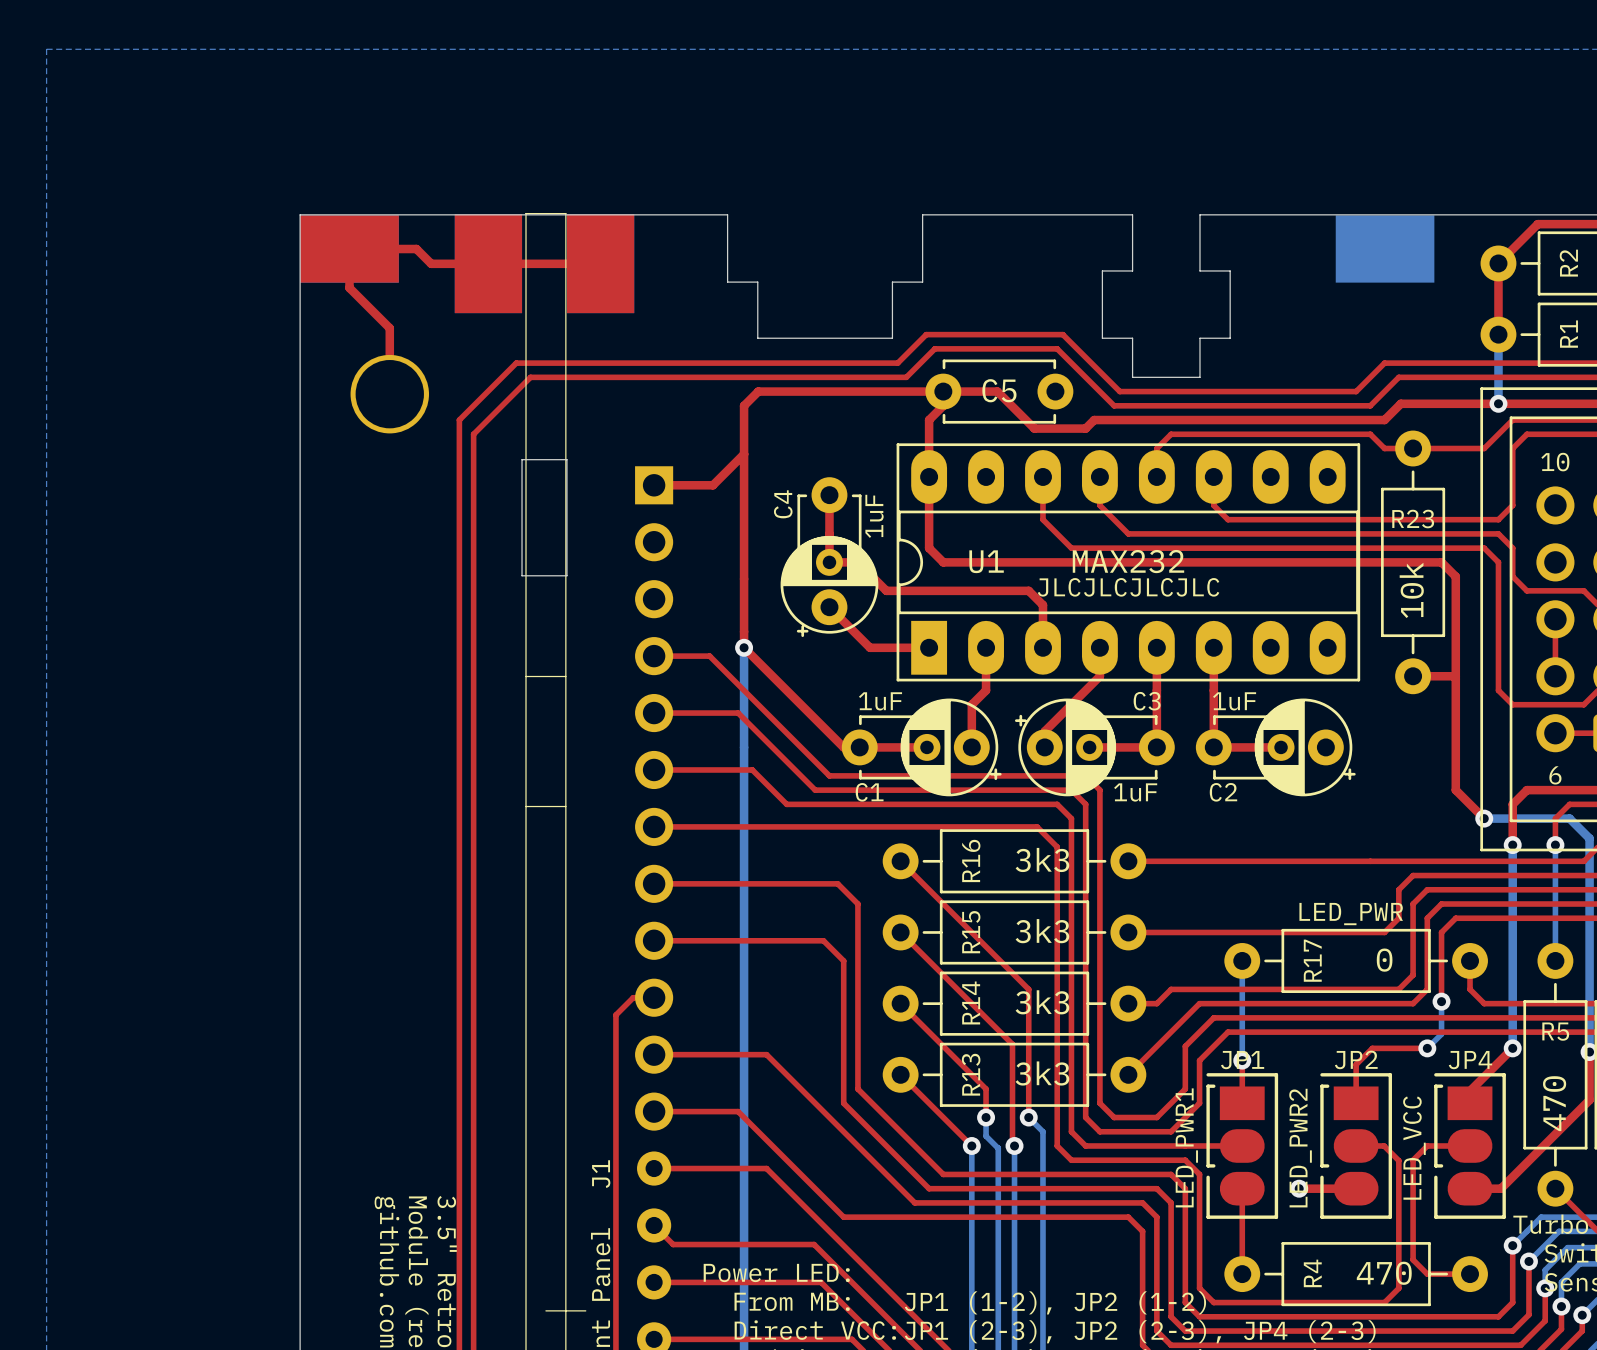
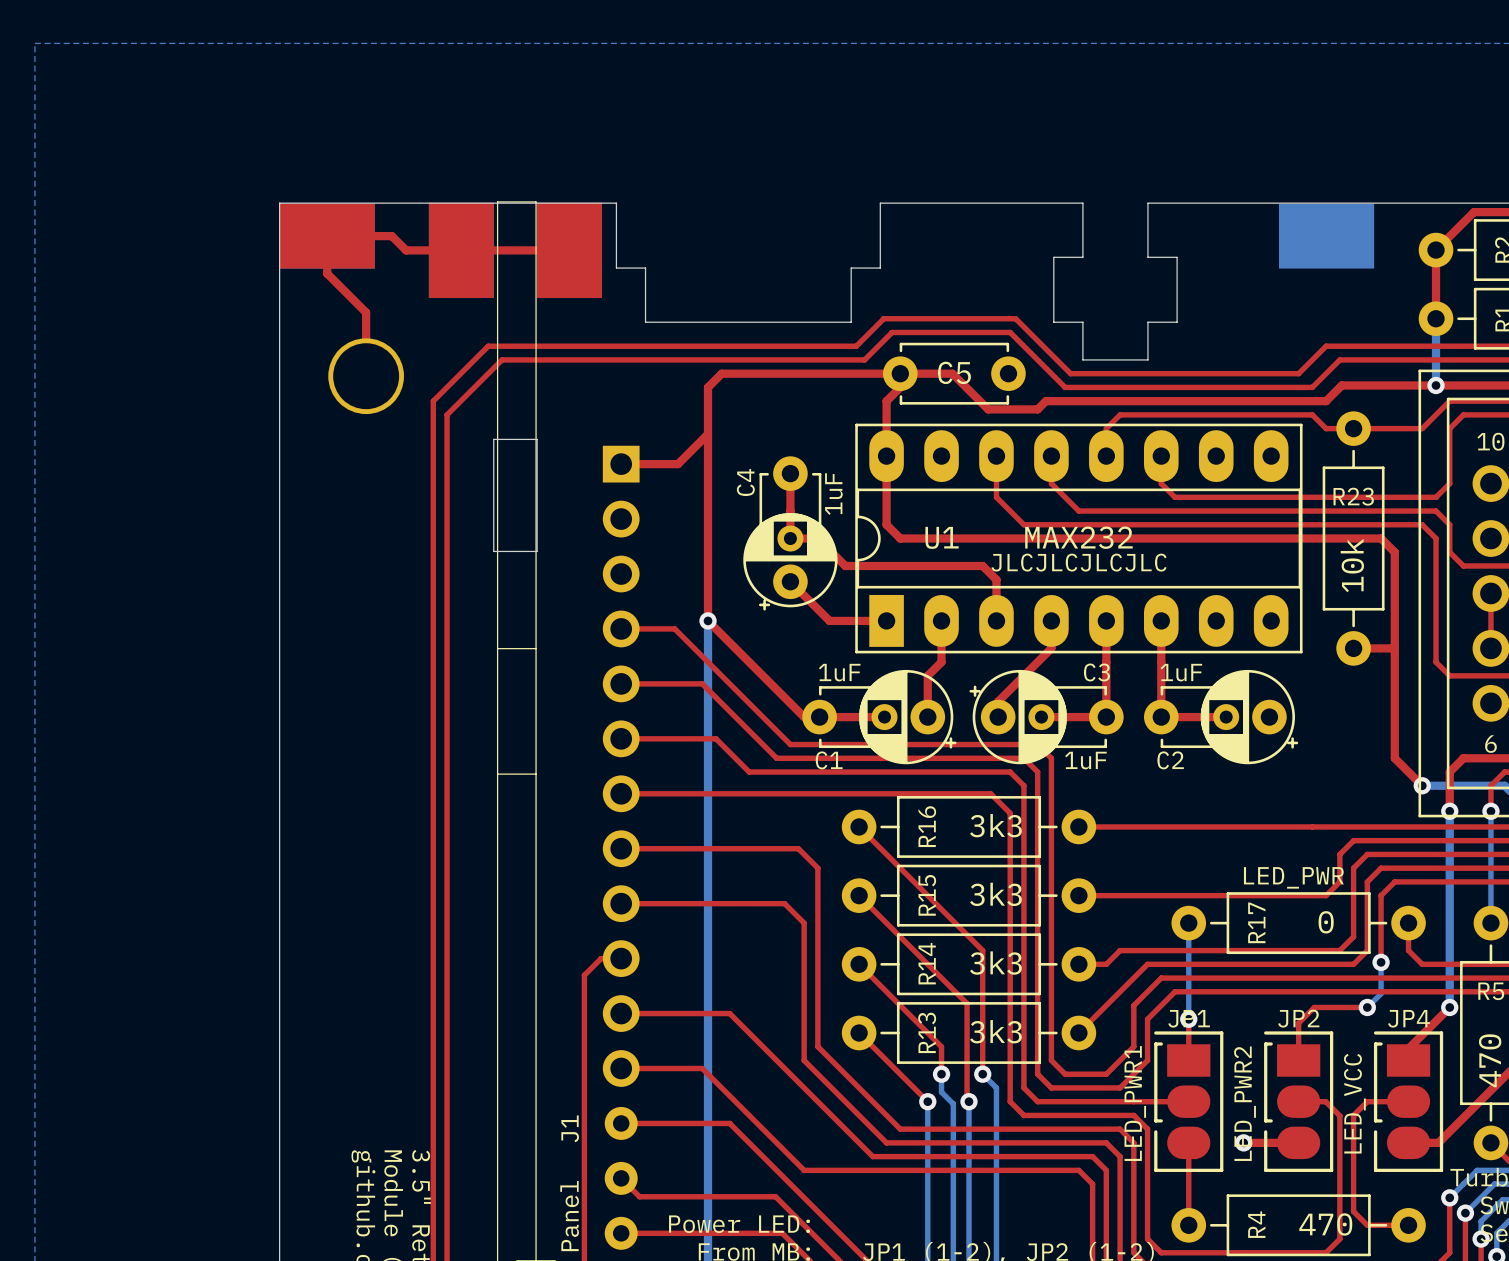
board edge: (649, 214) (727, 214) (727, 282) (757, 282) (757, 338) -> (616, 203) (616, 268) (645, 268) (645, 322) (721, 322)

